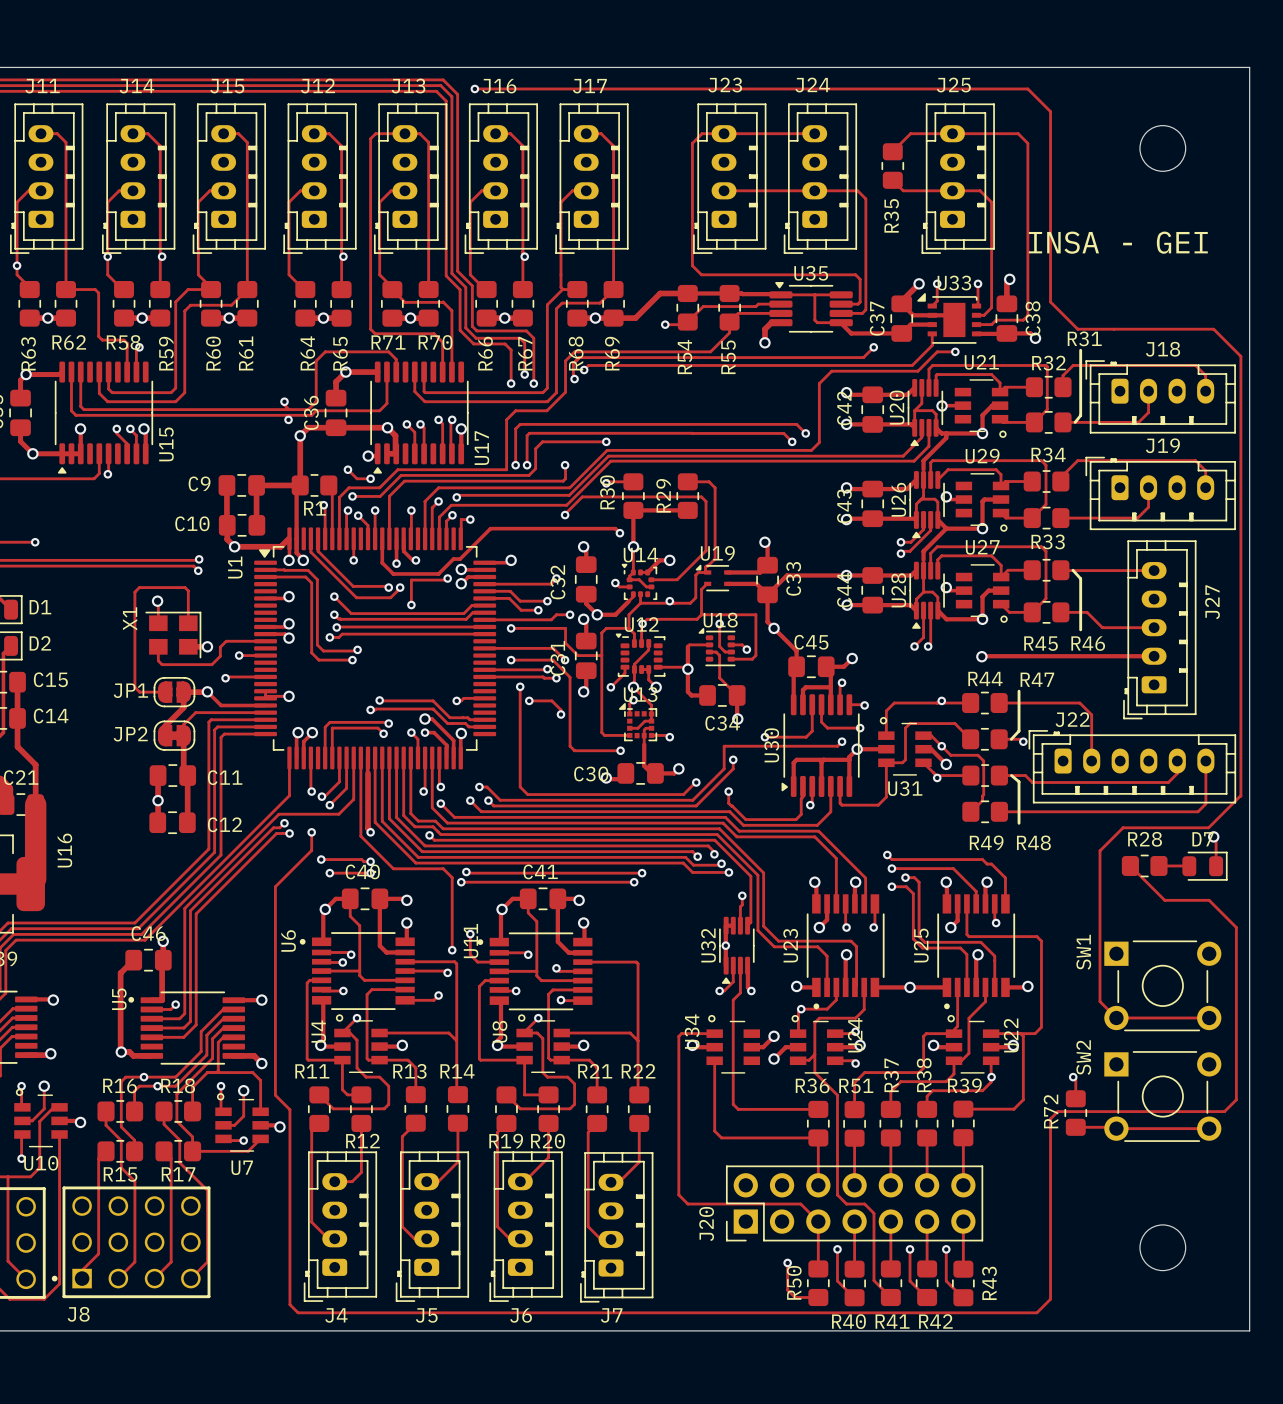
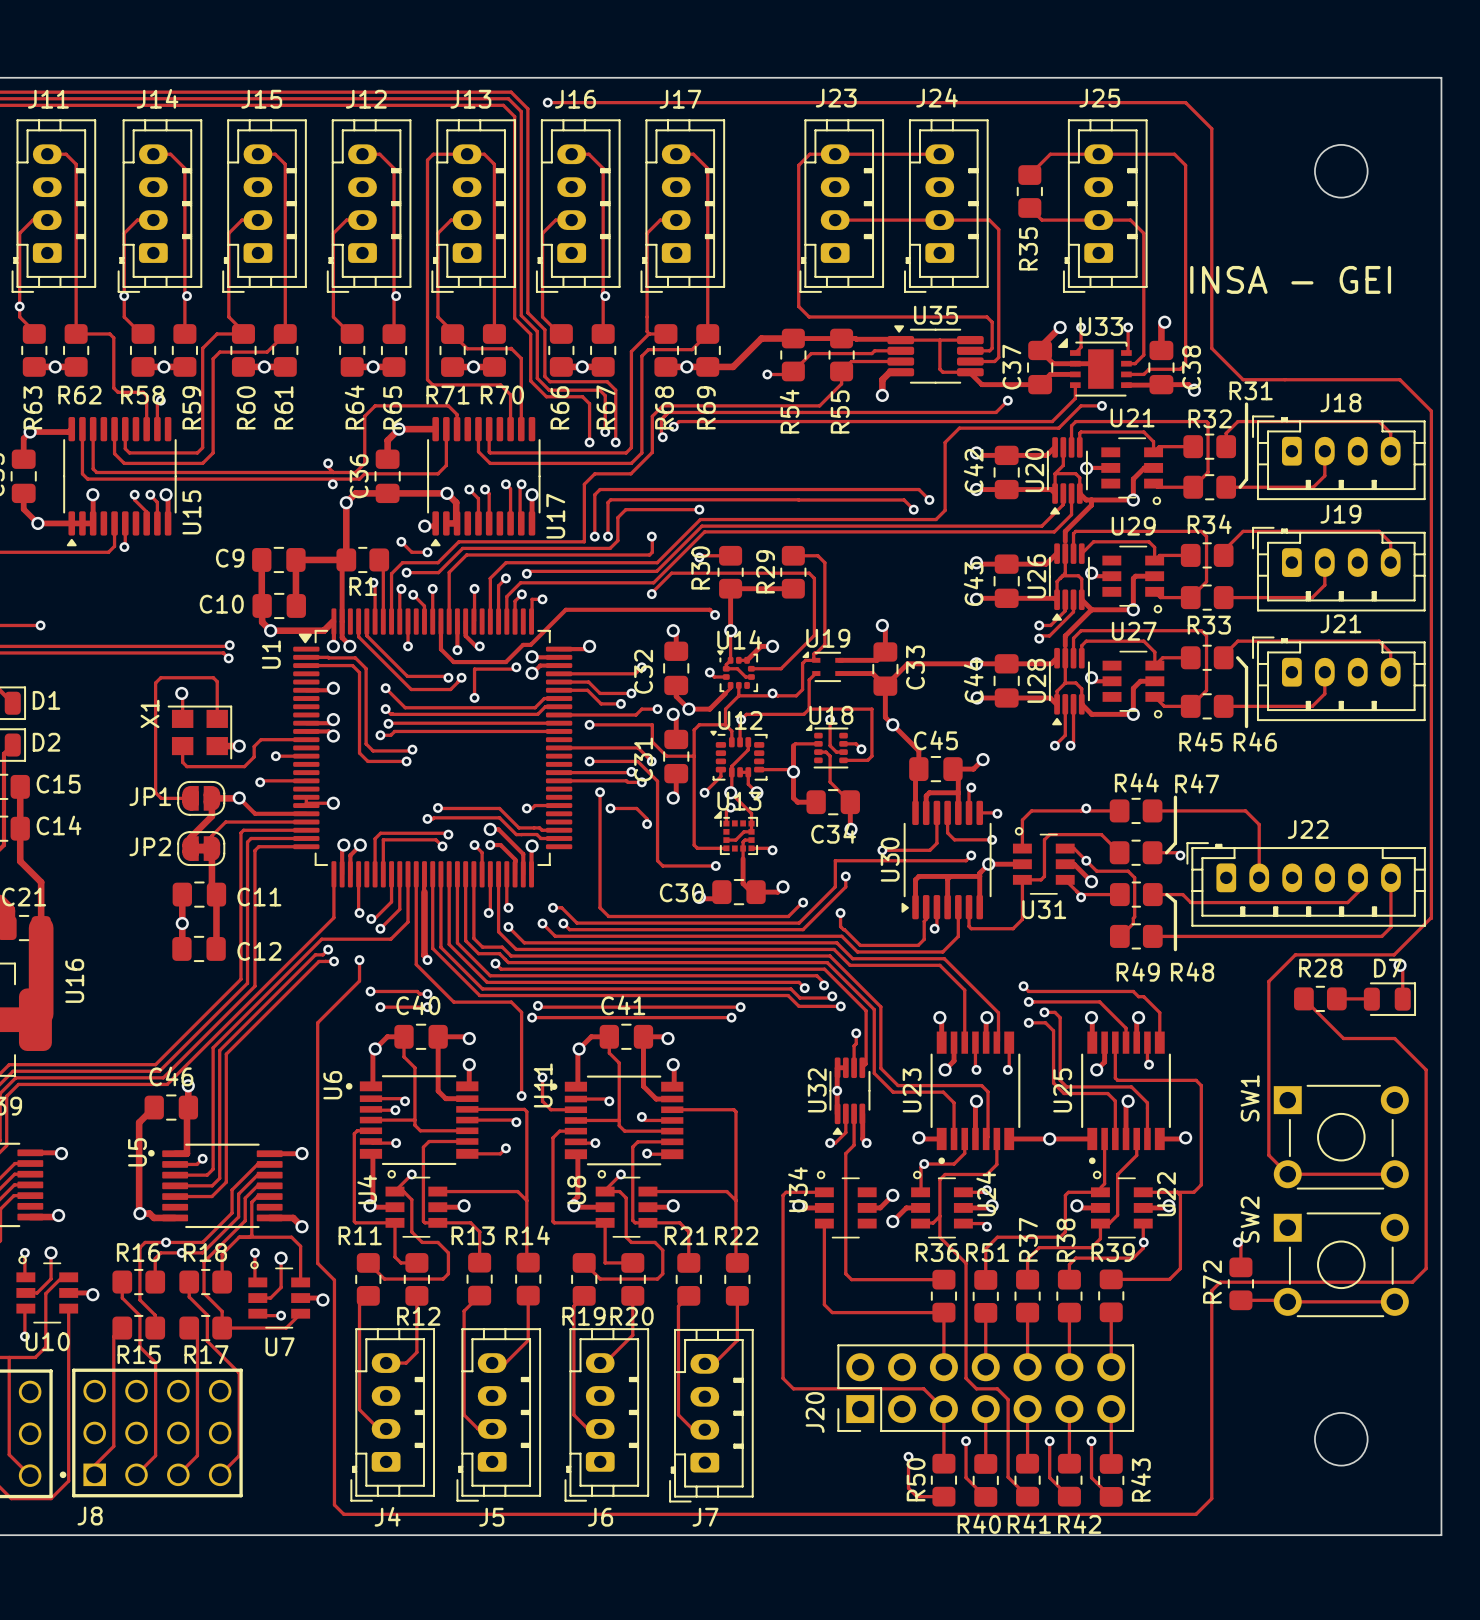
track: none -> (1223, 655) (1237, 641) (1379, 641) (1390, 652) (1390, 672)
track: (1060, 570) (1154, 570) -> none
J21: none -> (1338, 678)
track: (1087, 612) (1102, 627) (1154, 627) -> (1253, 706) (1312, 706) (1324, 693) (1324, 672)
J27: (1159, 629) -> none
via: (981, 656) -> none
track: (1154, 656) (981, 656) -> none
J22 name position: J22 (1072, 719) -> J22 (1308, 829)

